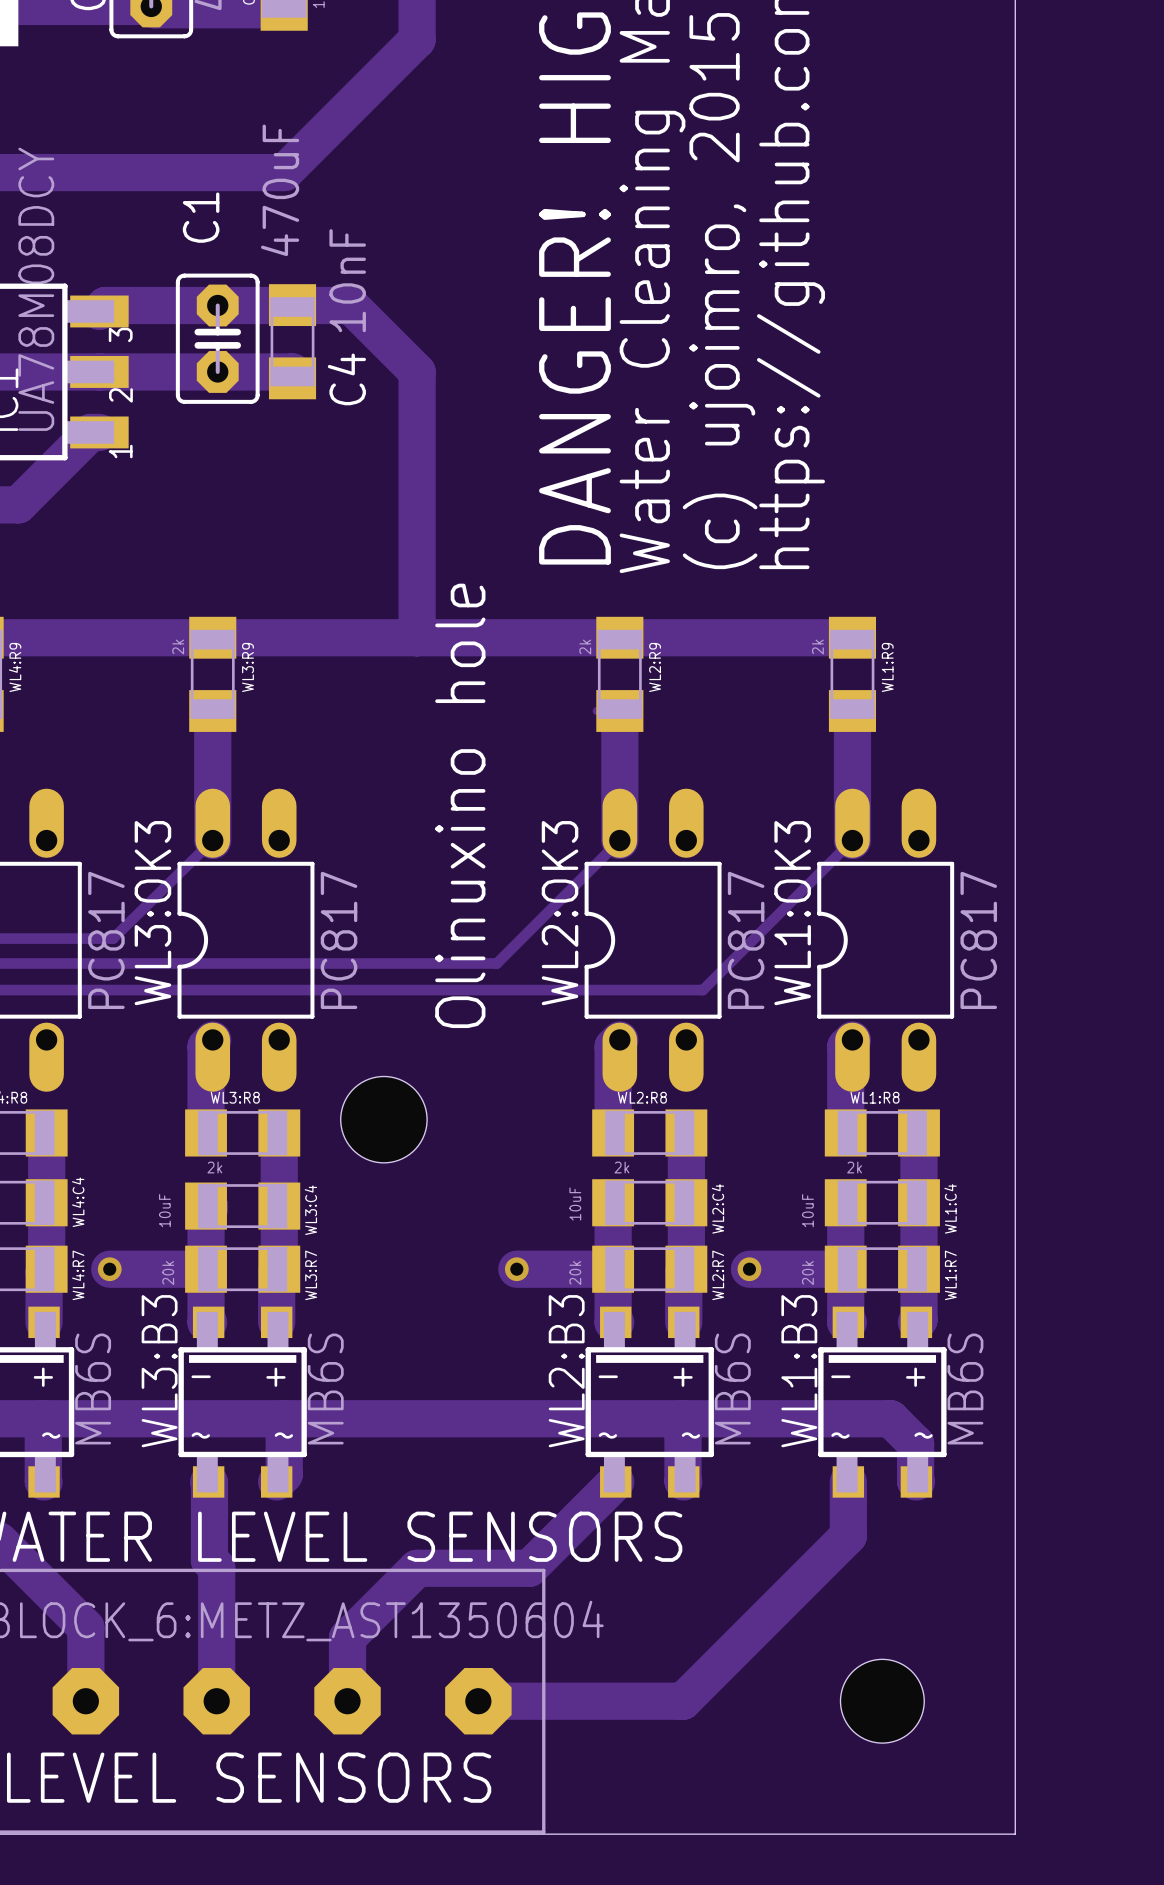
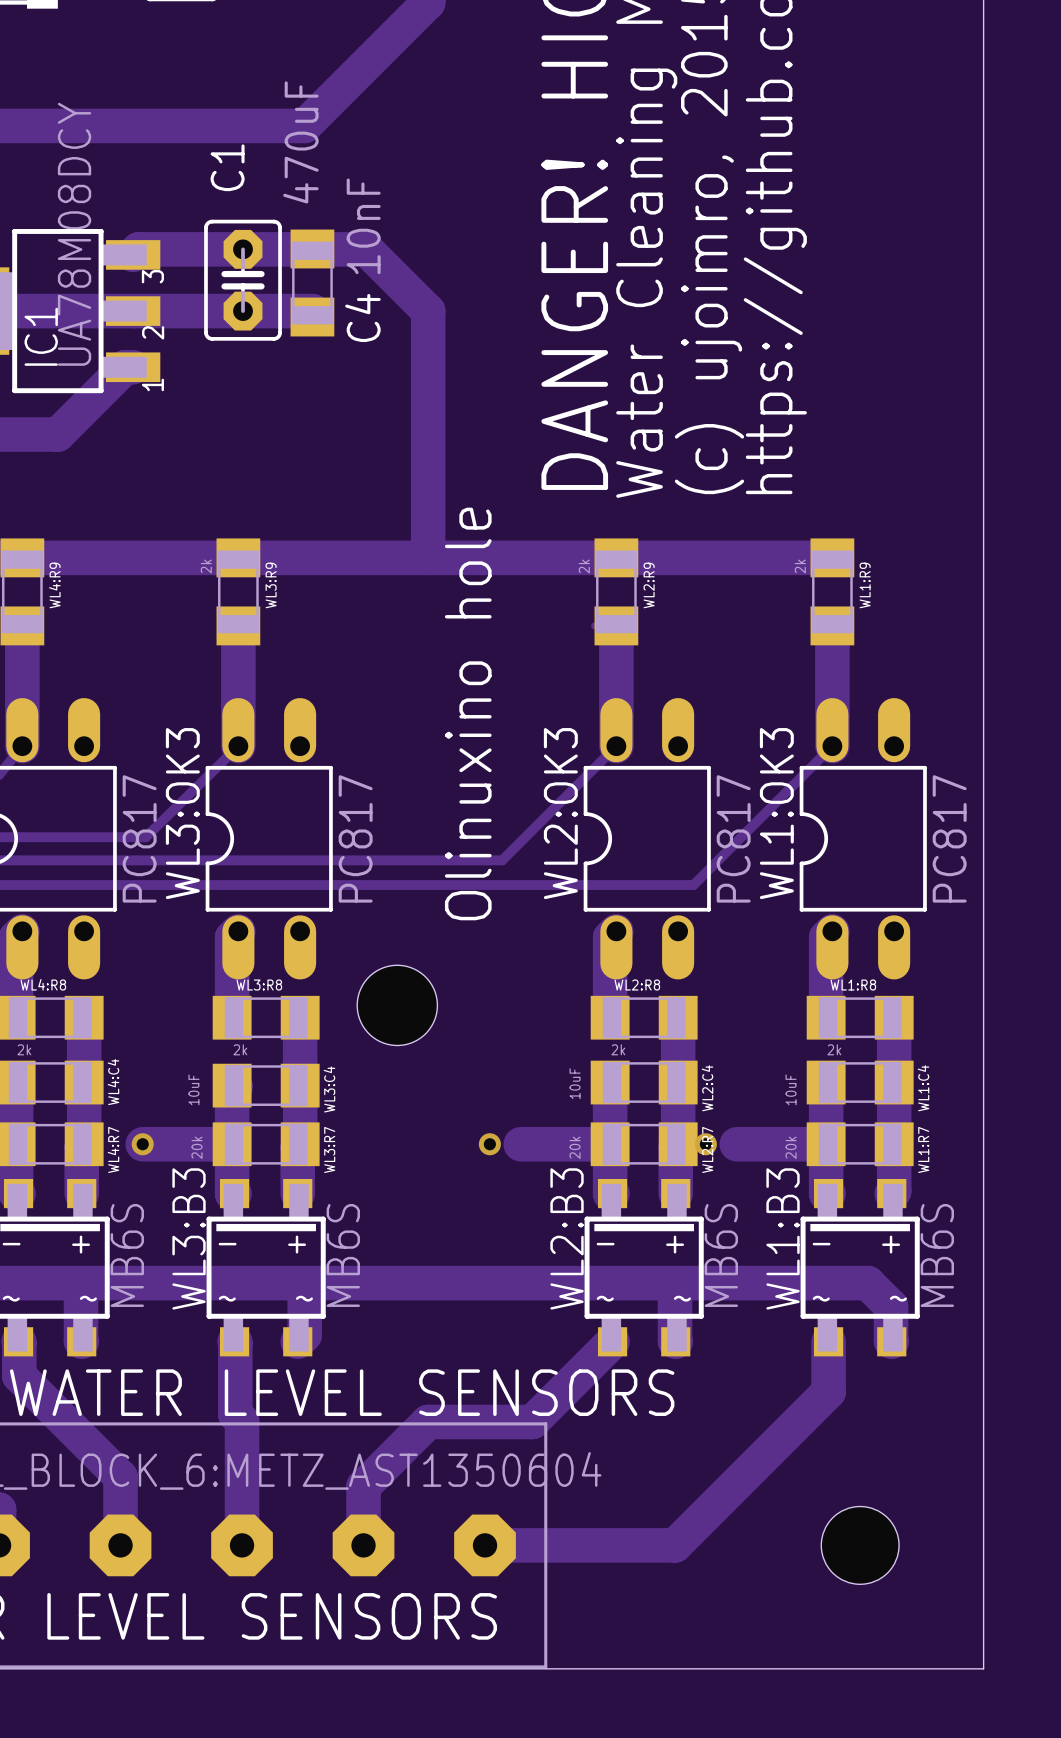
via position: (516, 1269) -> (489, 1144)
via position: (749, 1269) -> (705, 1144)

